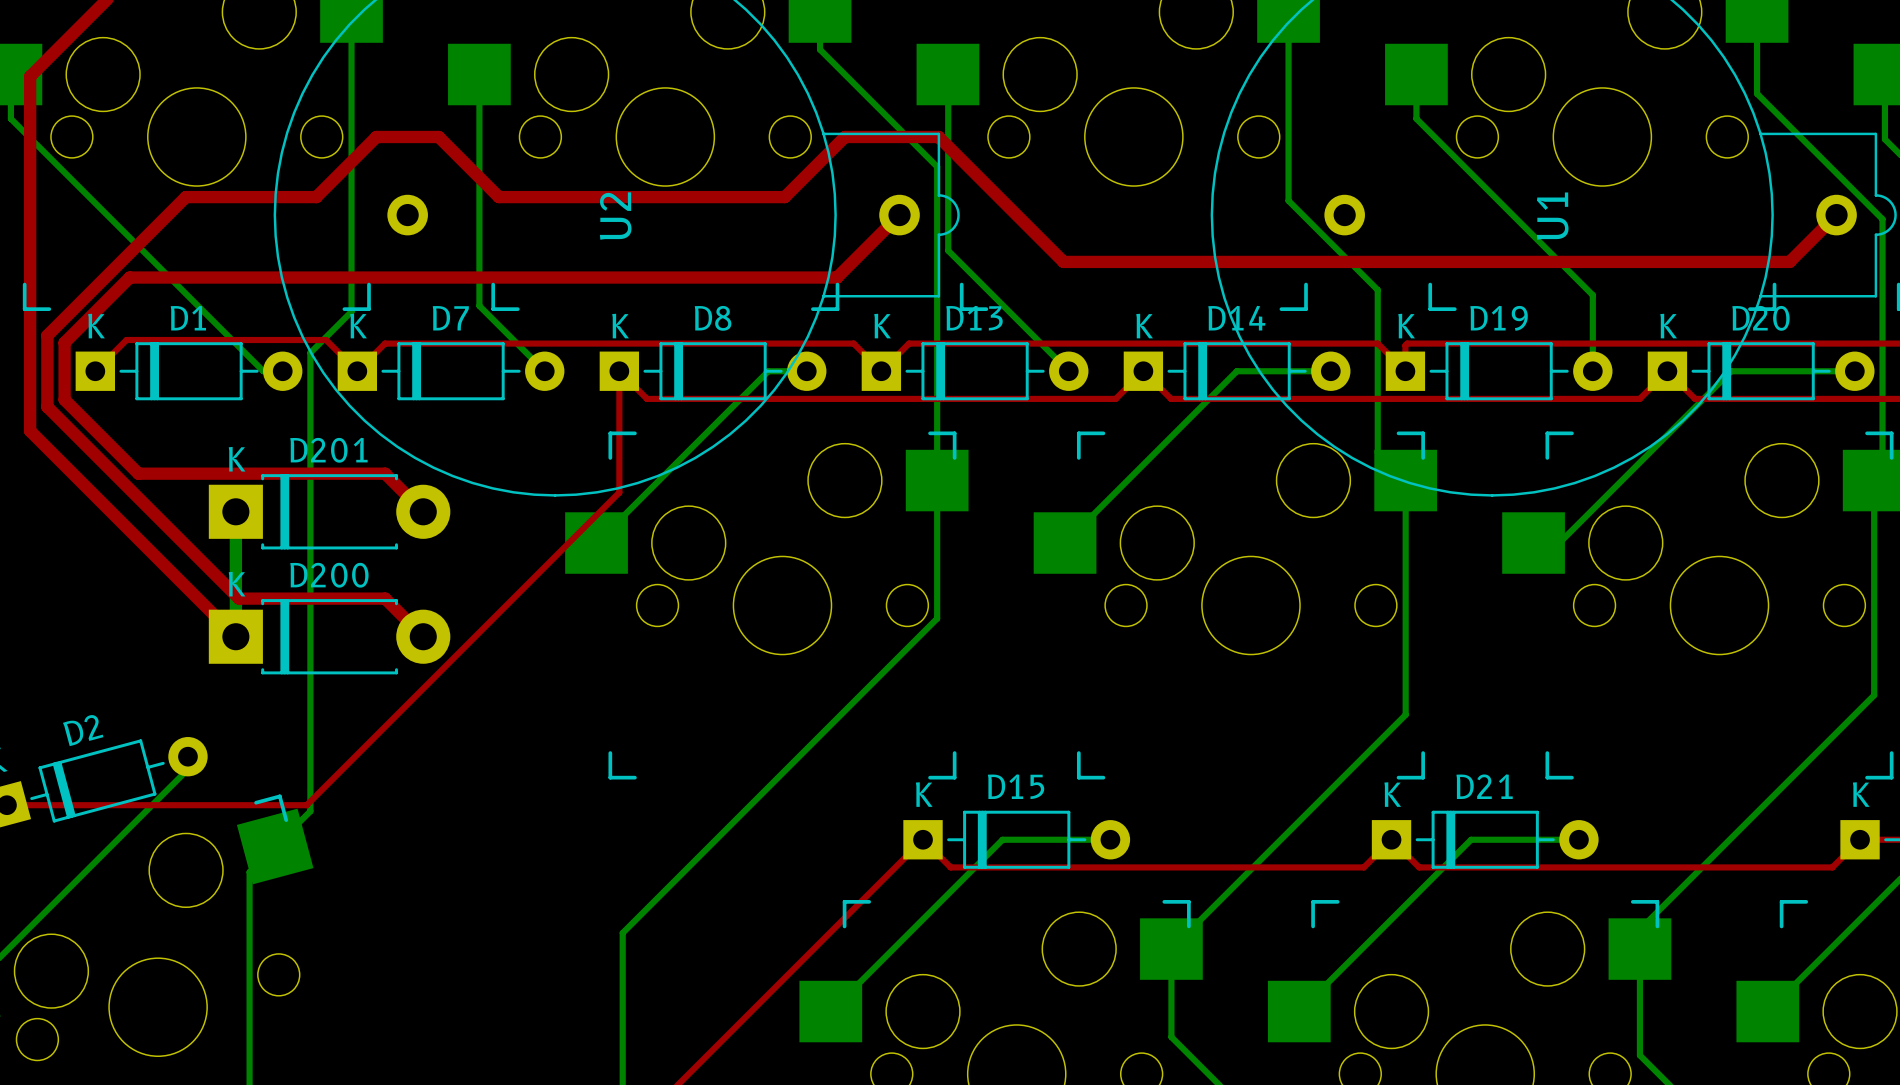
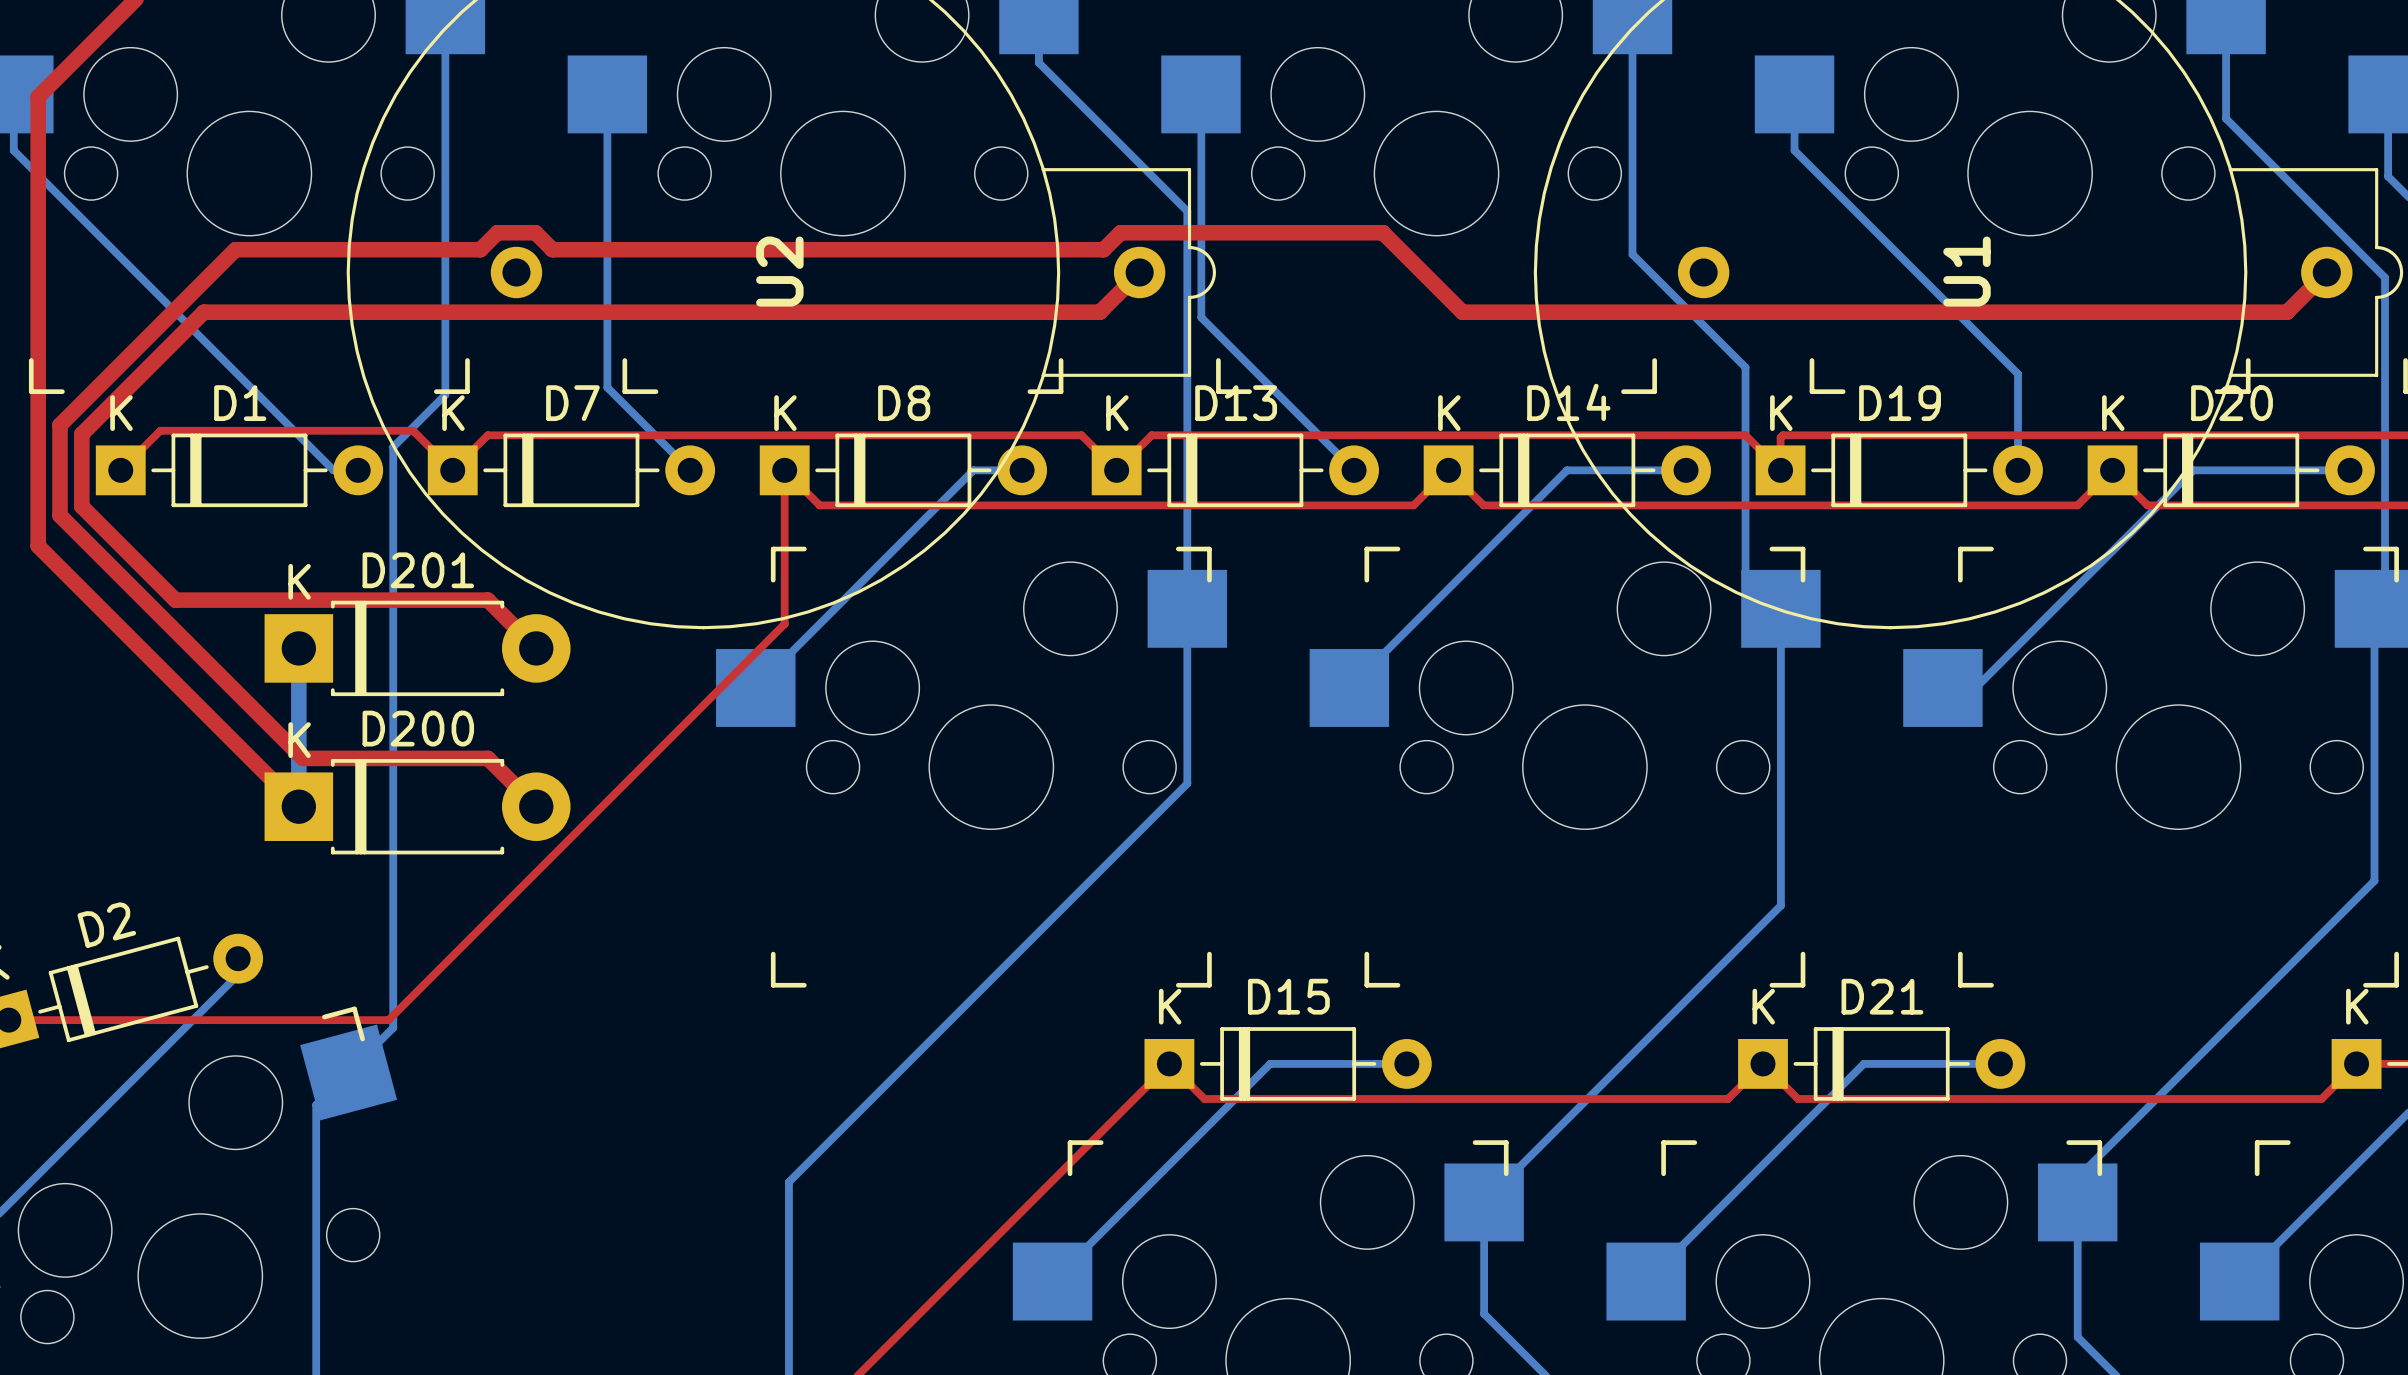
top track: (316, 197) (376, 136) (438, 136) (498, 197) -> (400, 249) (480, 249) (497, 232) (535, 232) (552, 249) (632, 249)
top track: (784, 197) (844, 136) (938, 136) (1063, 261) (1789, 261) (1805, 246) -> (994, 249) (1103, 249) (1120, 232) (1383, 232) (1462, 312) (2287, 312)
top track: (868, 246) (837, 277) (129, 277) -> (1099, 312) (203, 312) (164, 351)

